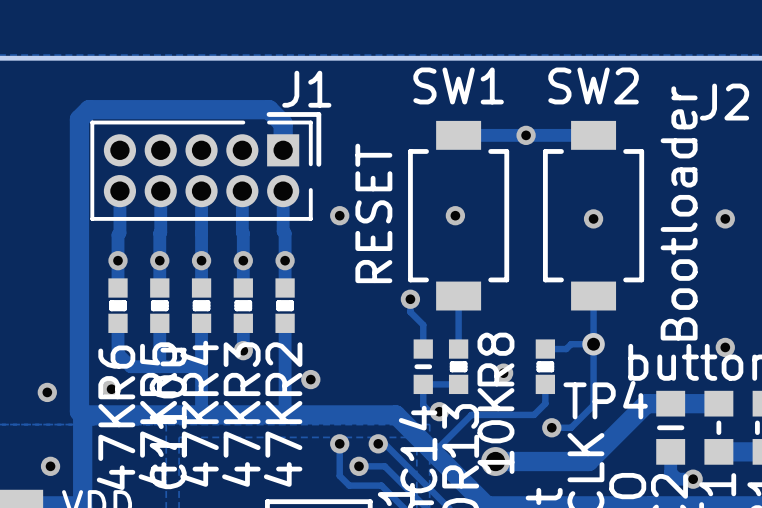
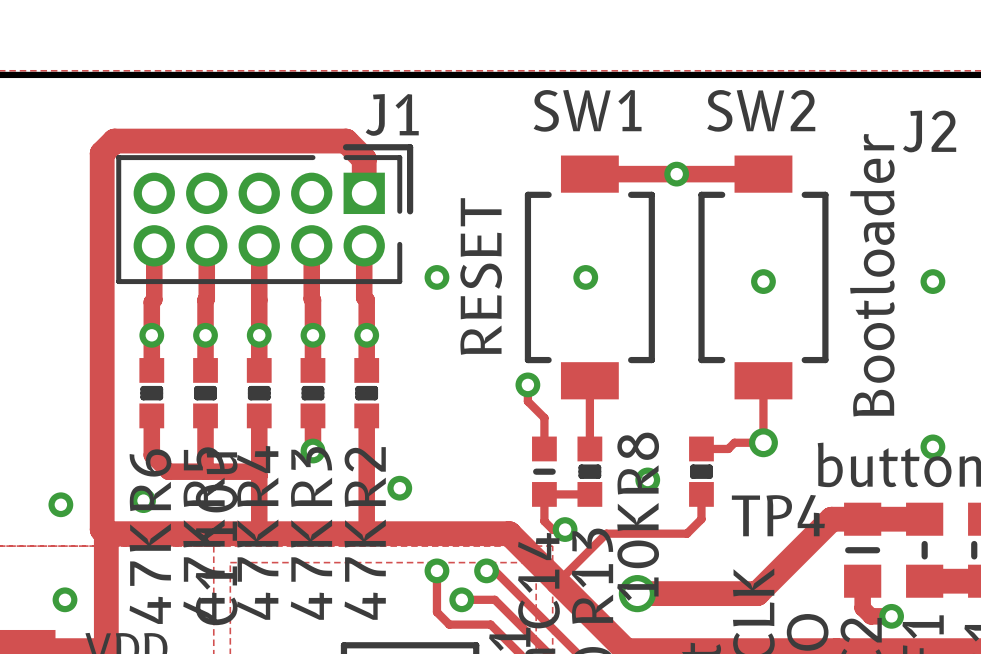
track: (593, 344) (593, 405) (571, 427) (551, 427) -> none
via: (551, 427) -> none

